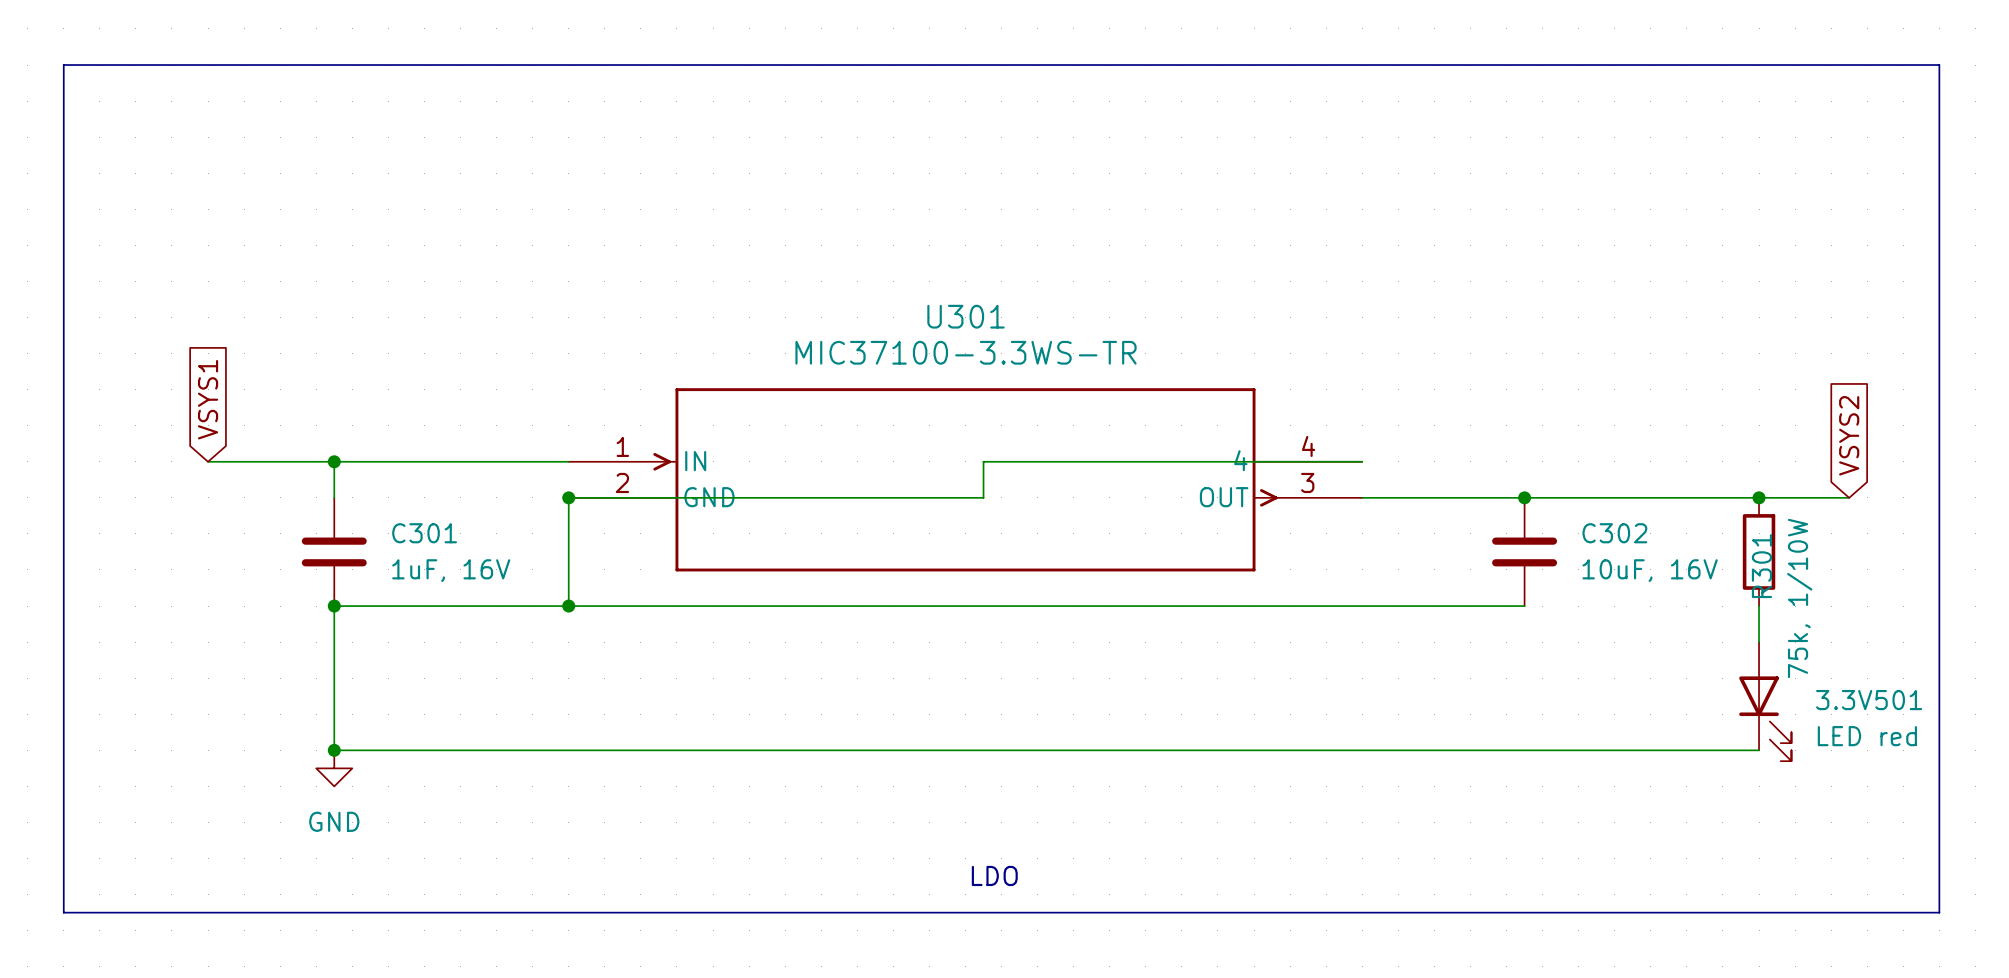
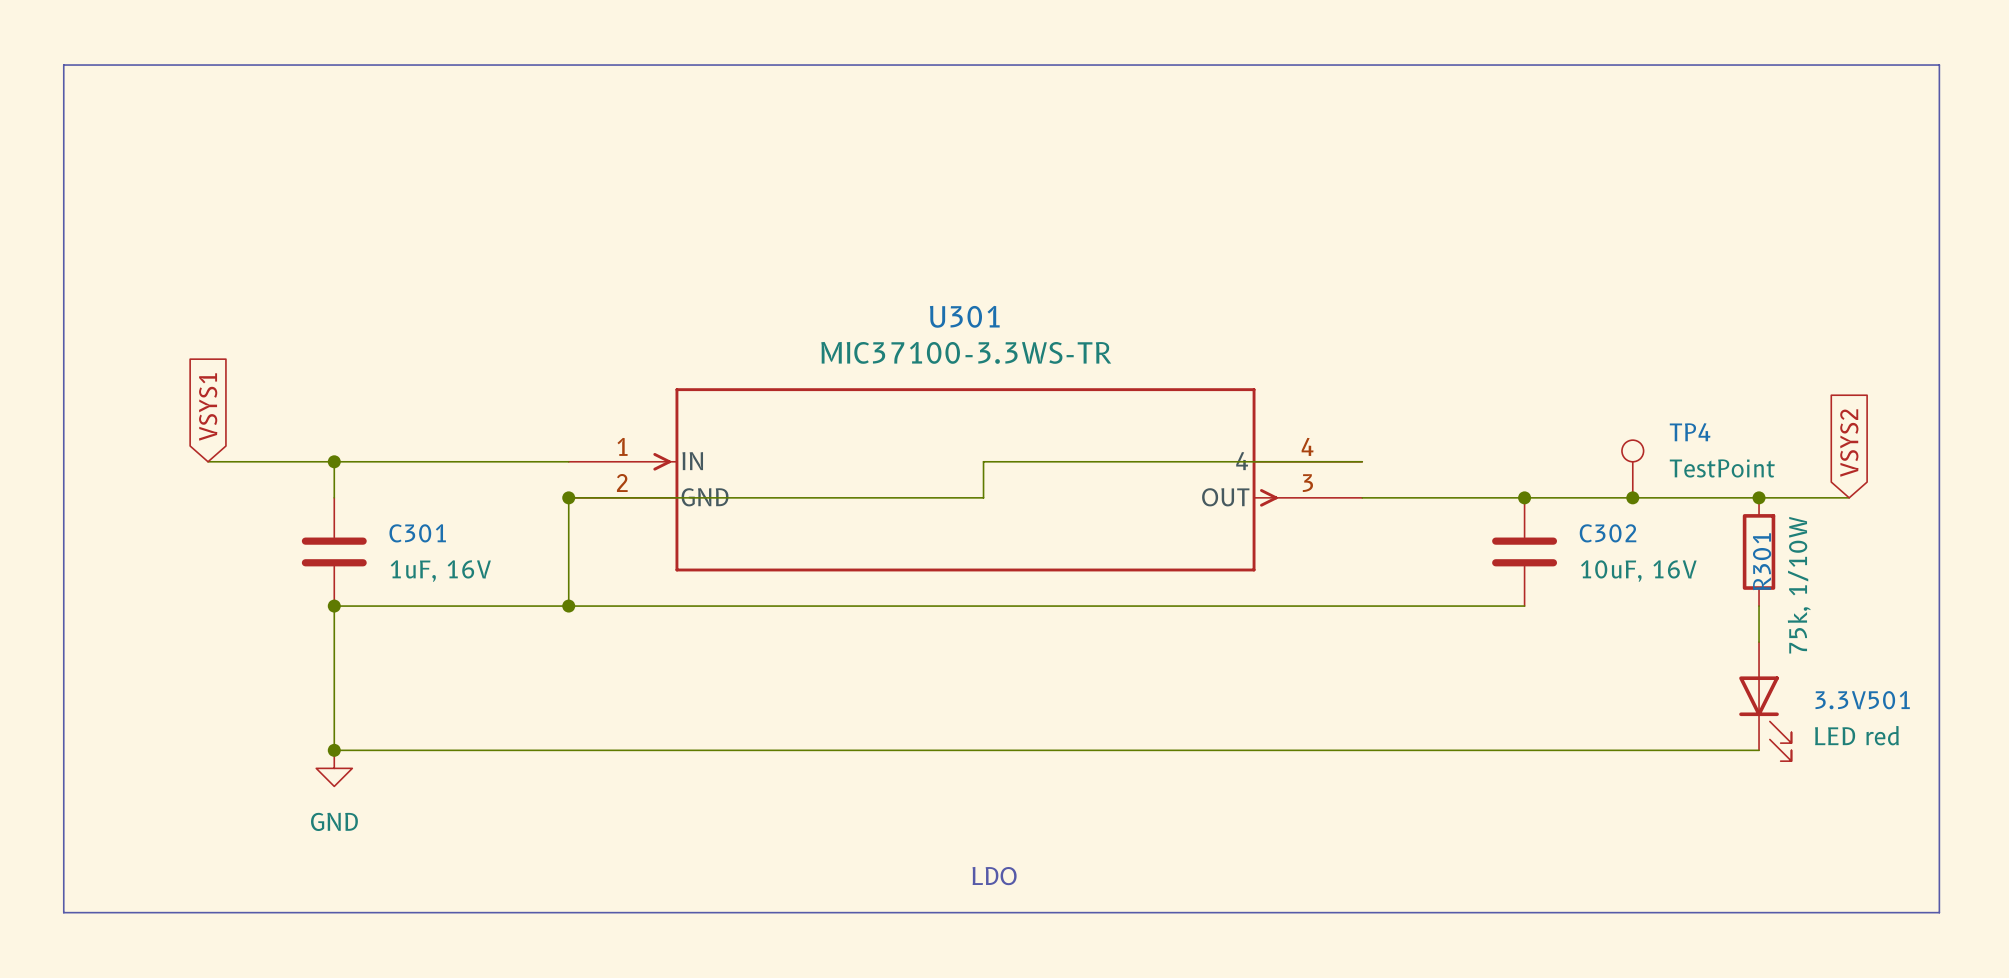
TP4: none -> TestPoint (1632, 469)
junction: none -> (1632, 497)

